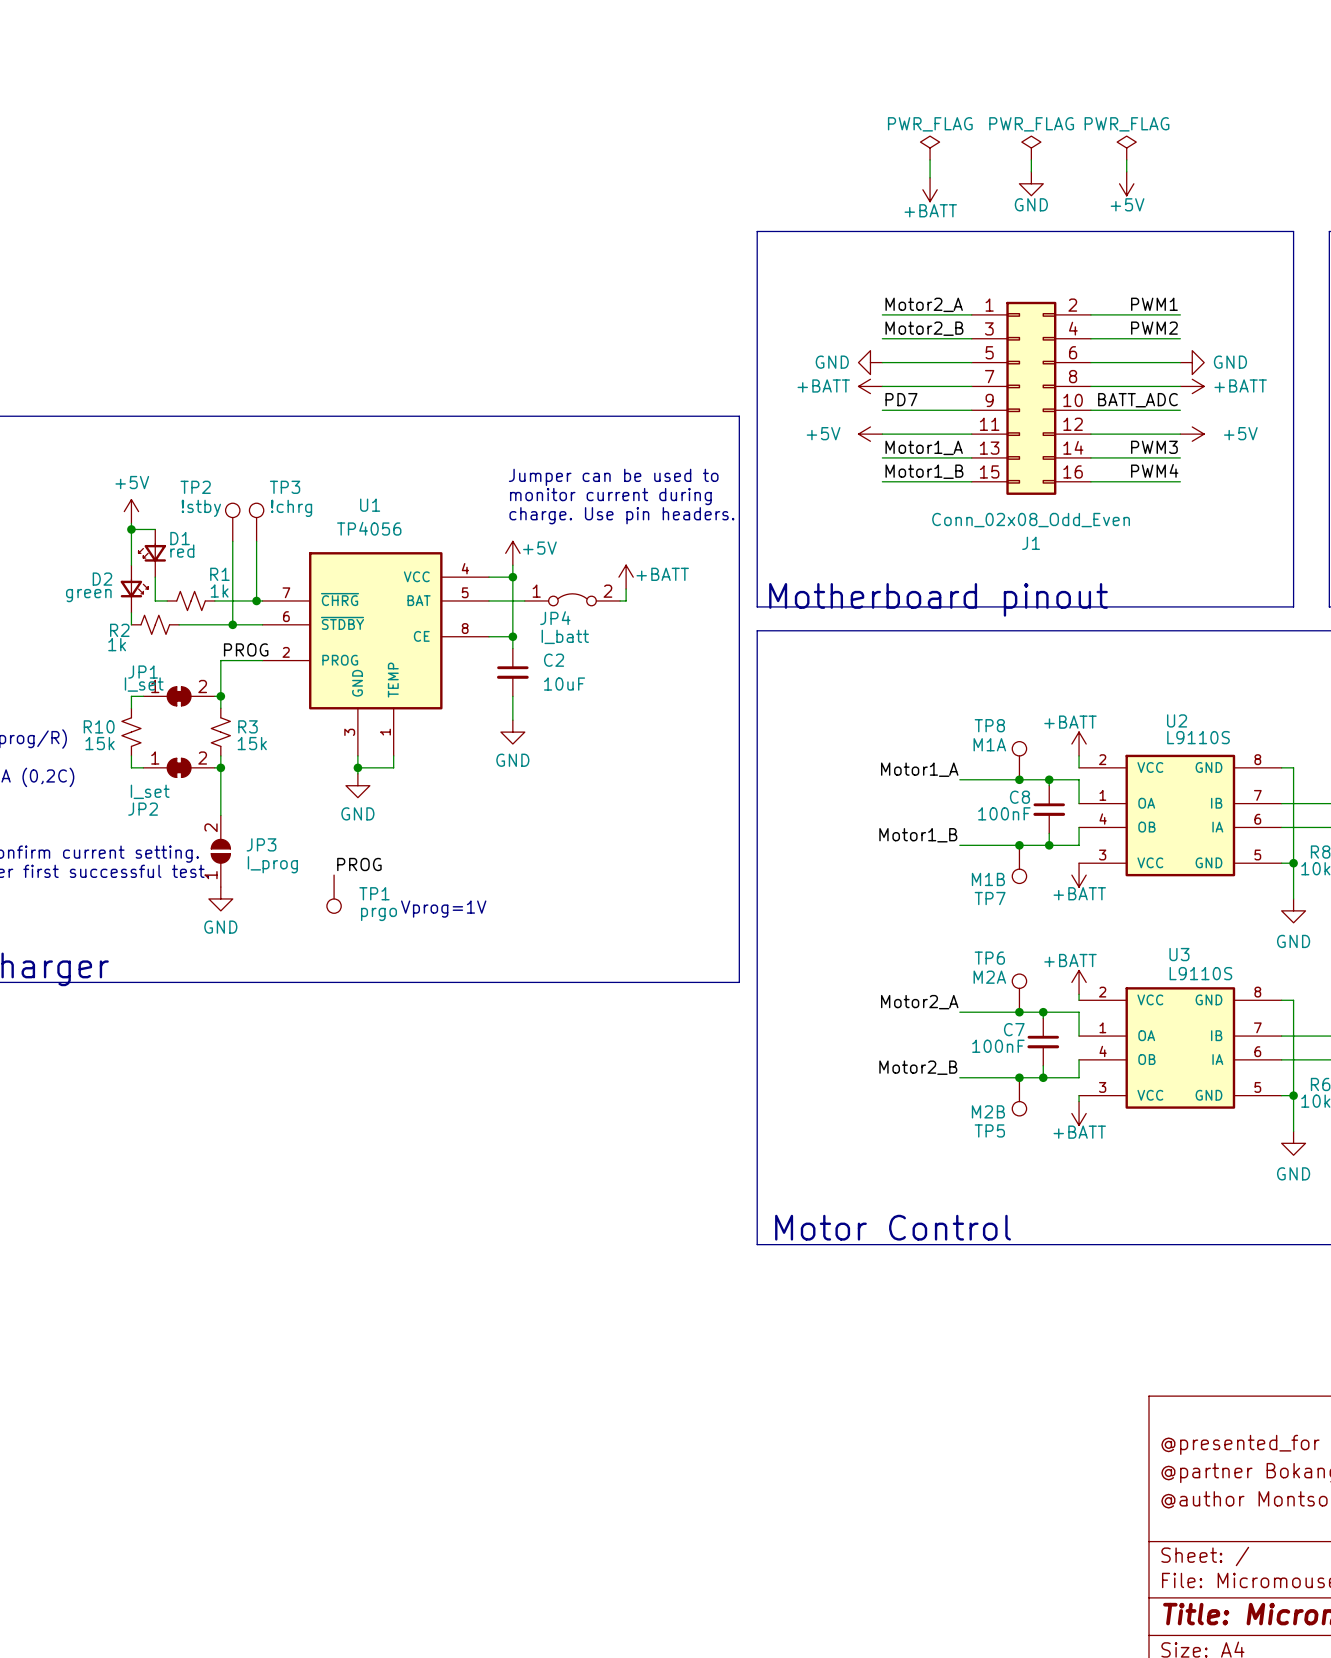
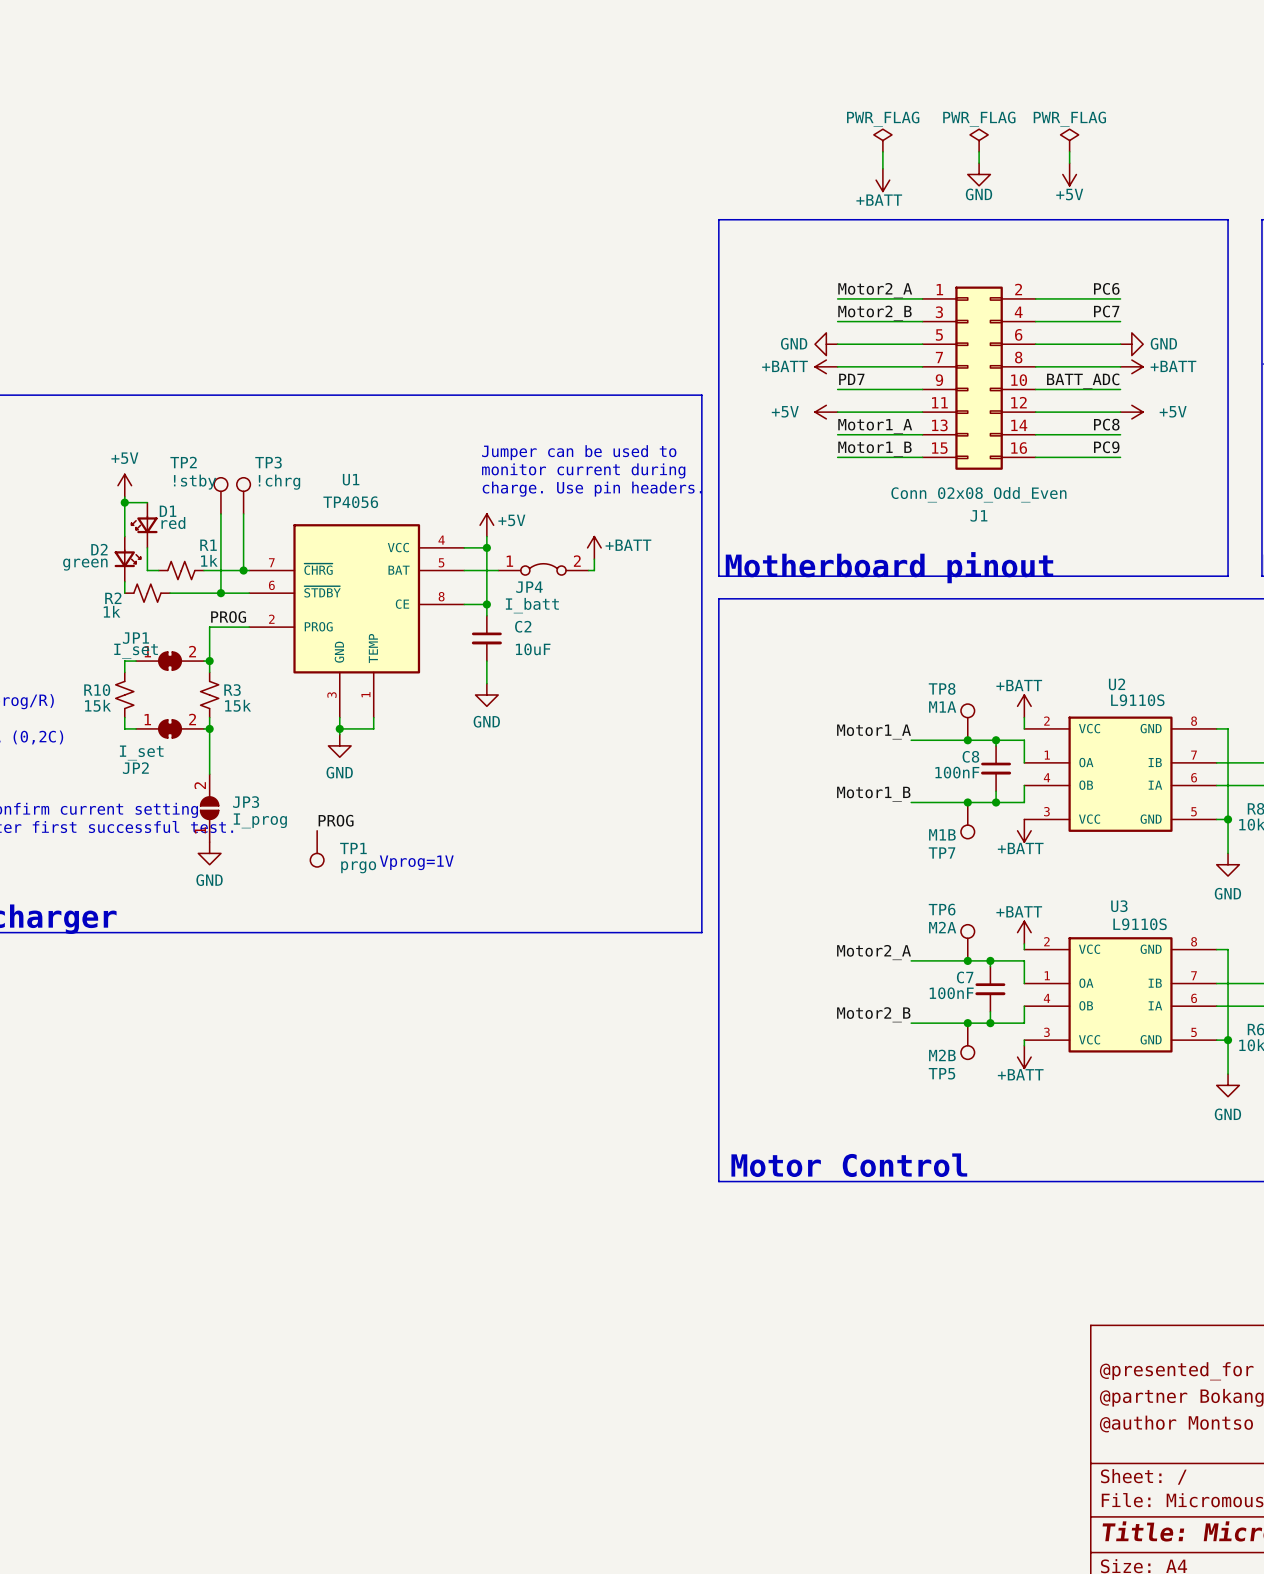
label: PWM1 (1154, 304) -> PC6 (1106, 288)
label: PWM2 (1154, 328) -> PC7 (1106, 311)
label: PWM3 (1154, 447) -> PC8 (1106, 424)
label: PWM4 (1154, 470) -> PC9 (1106, 447)

